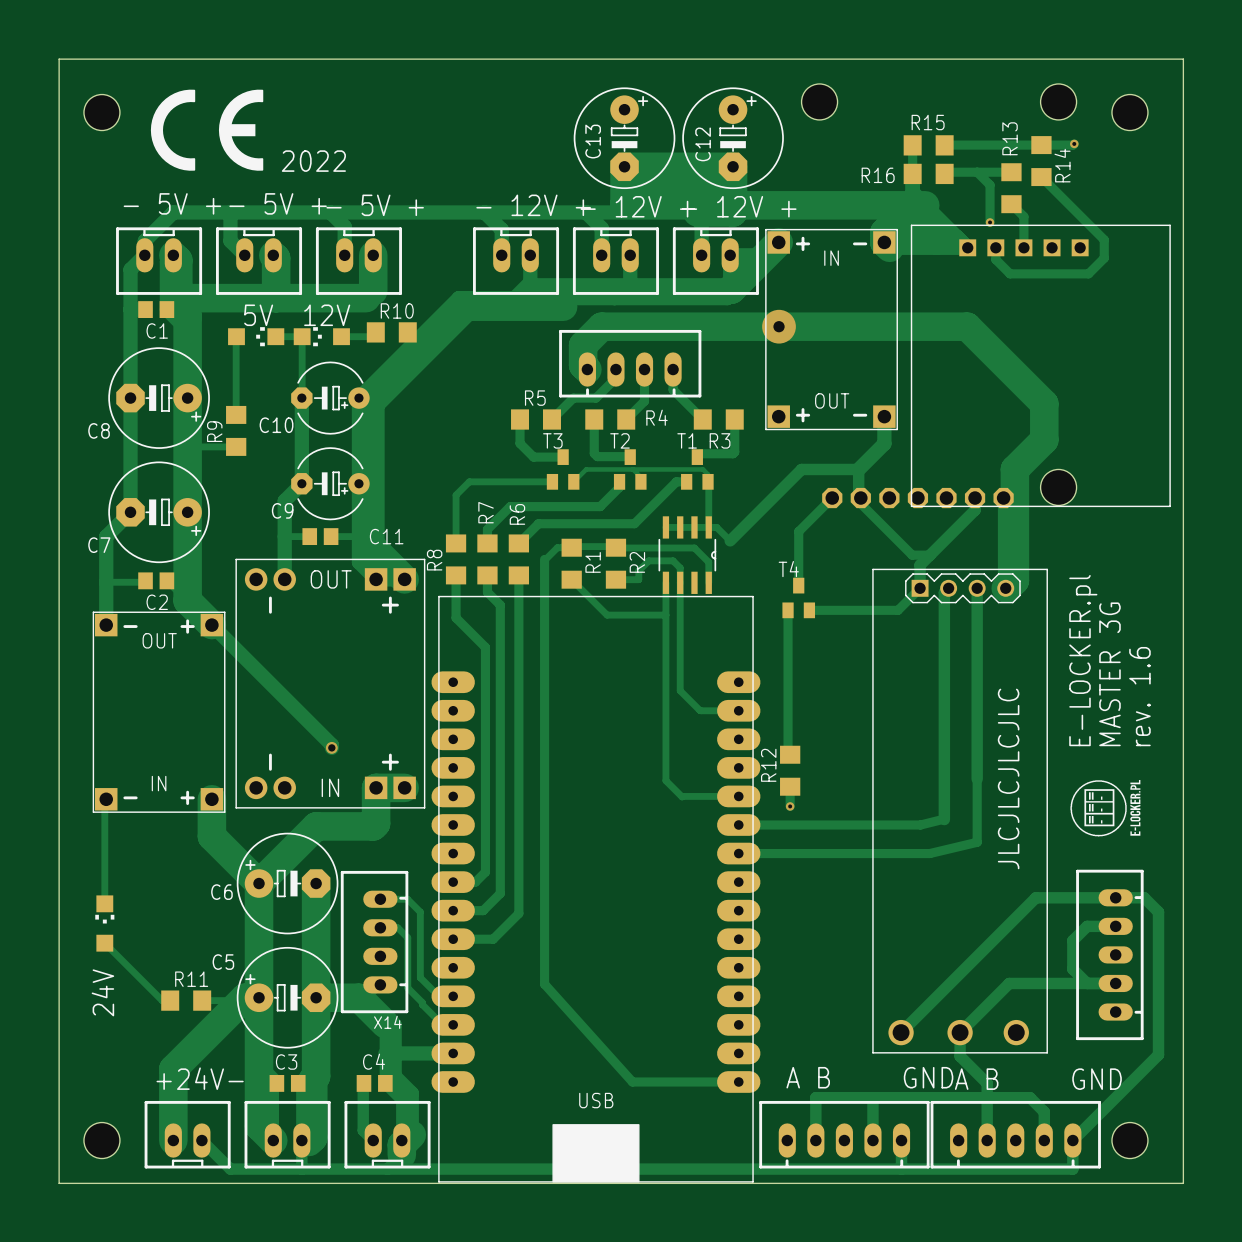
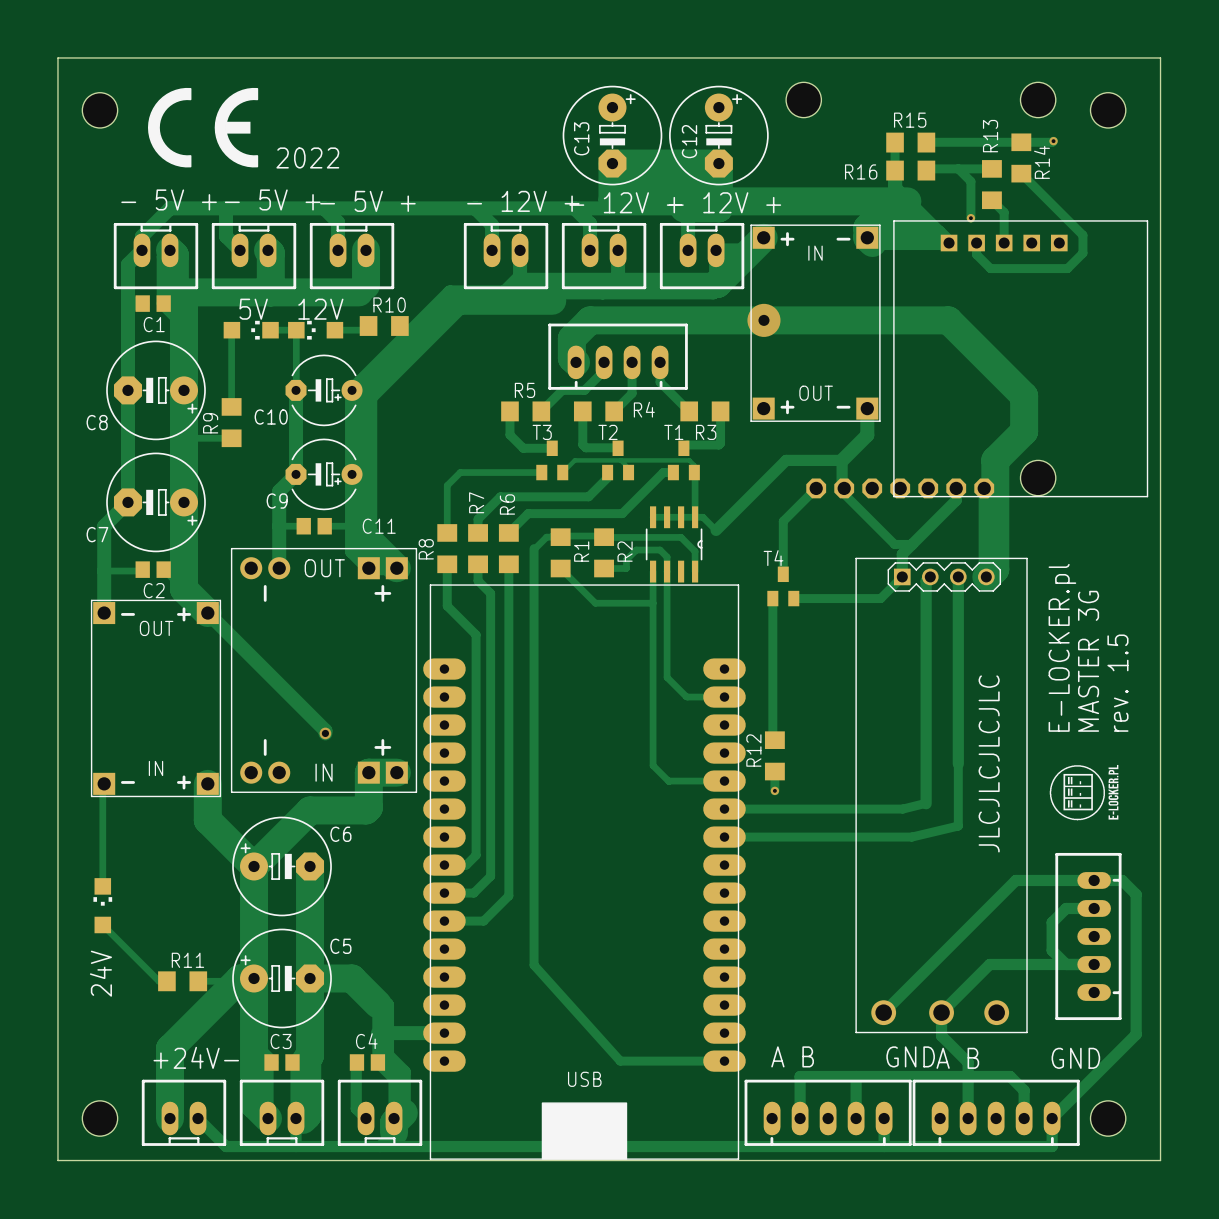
text: rev. 1.6 (1139, 696) -> rev. 1.5 (1117, 683)
C6 name position: C6 (221, 892) -> C6 (340, 834)
track: (380, 899) (407, 899) (420, 912) (420, 977) (438, 996) (453, 996) -> none
track: (380, 927) (397, 927) (407, 937) (407, 988) (442, 1024) (453, 1024) -> none
X14: (374, 942) -> none
C5 name position: C5 (223, 962) -> C5 (340, 946)

